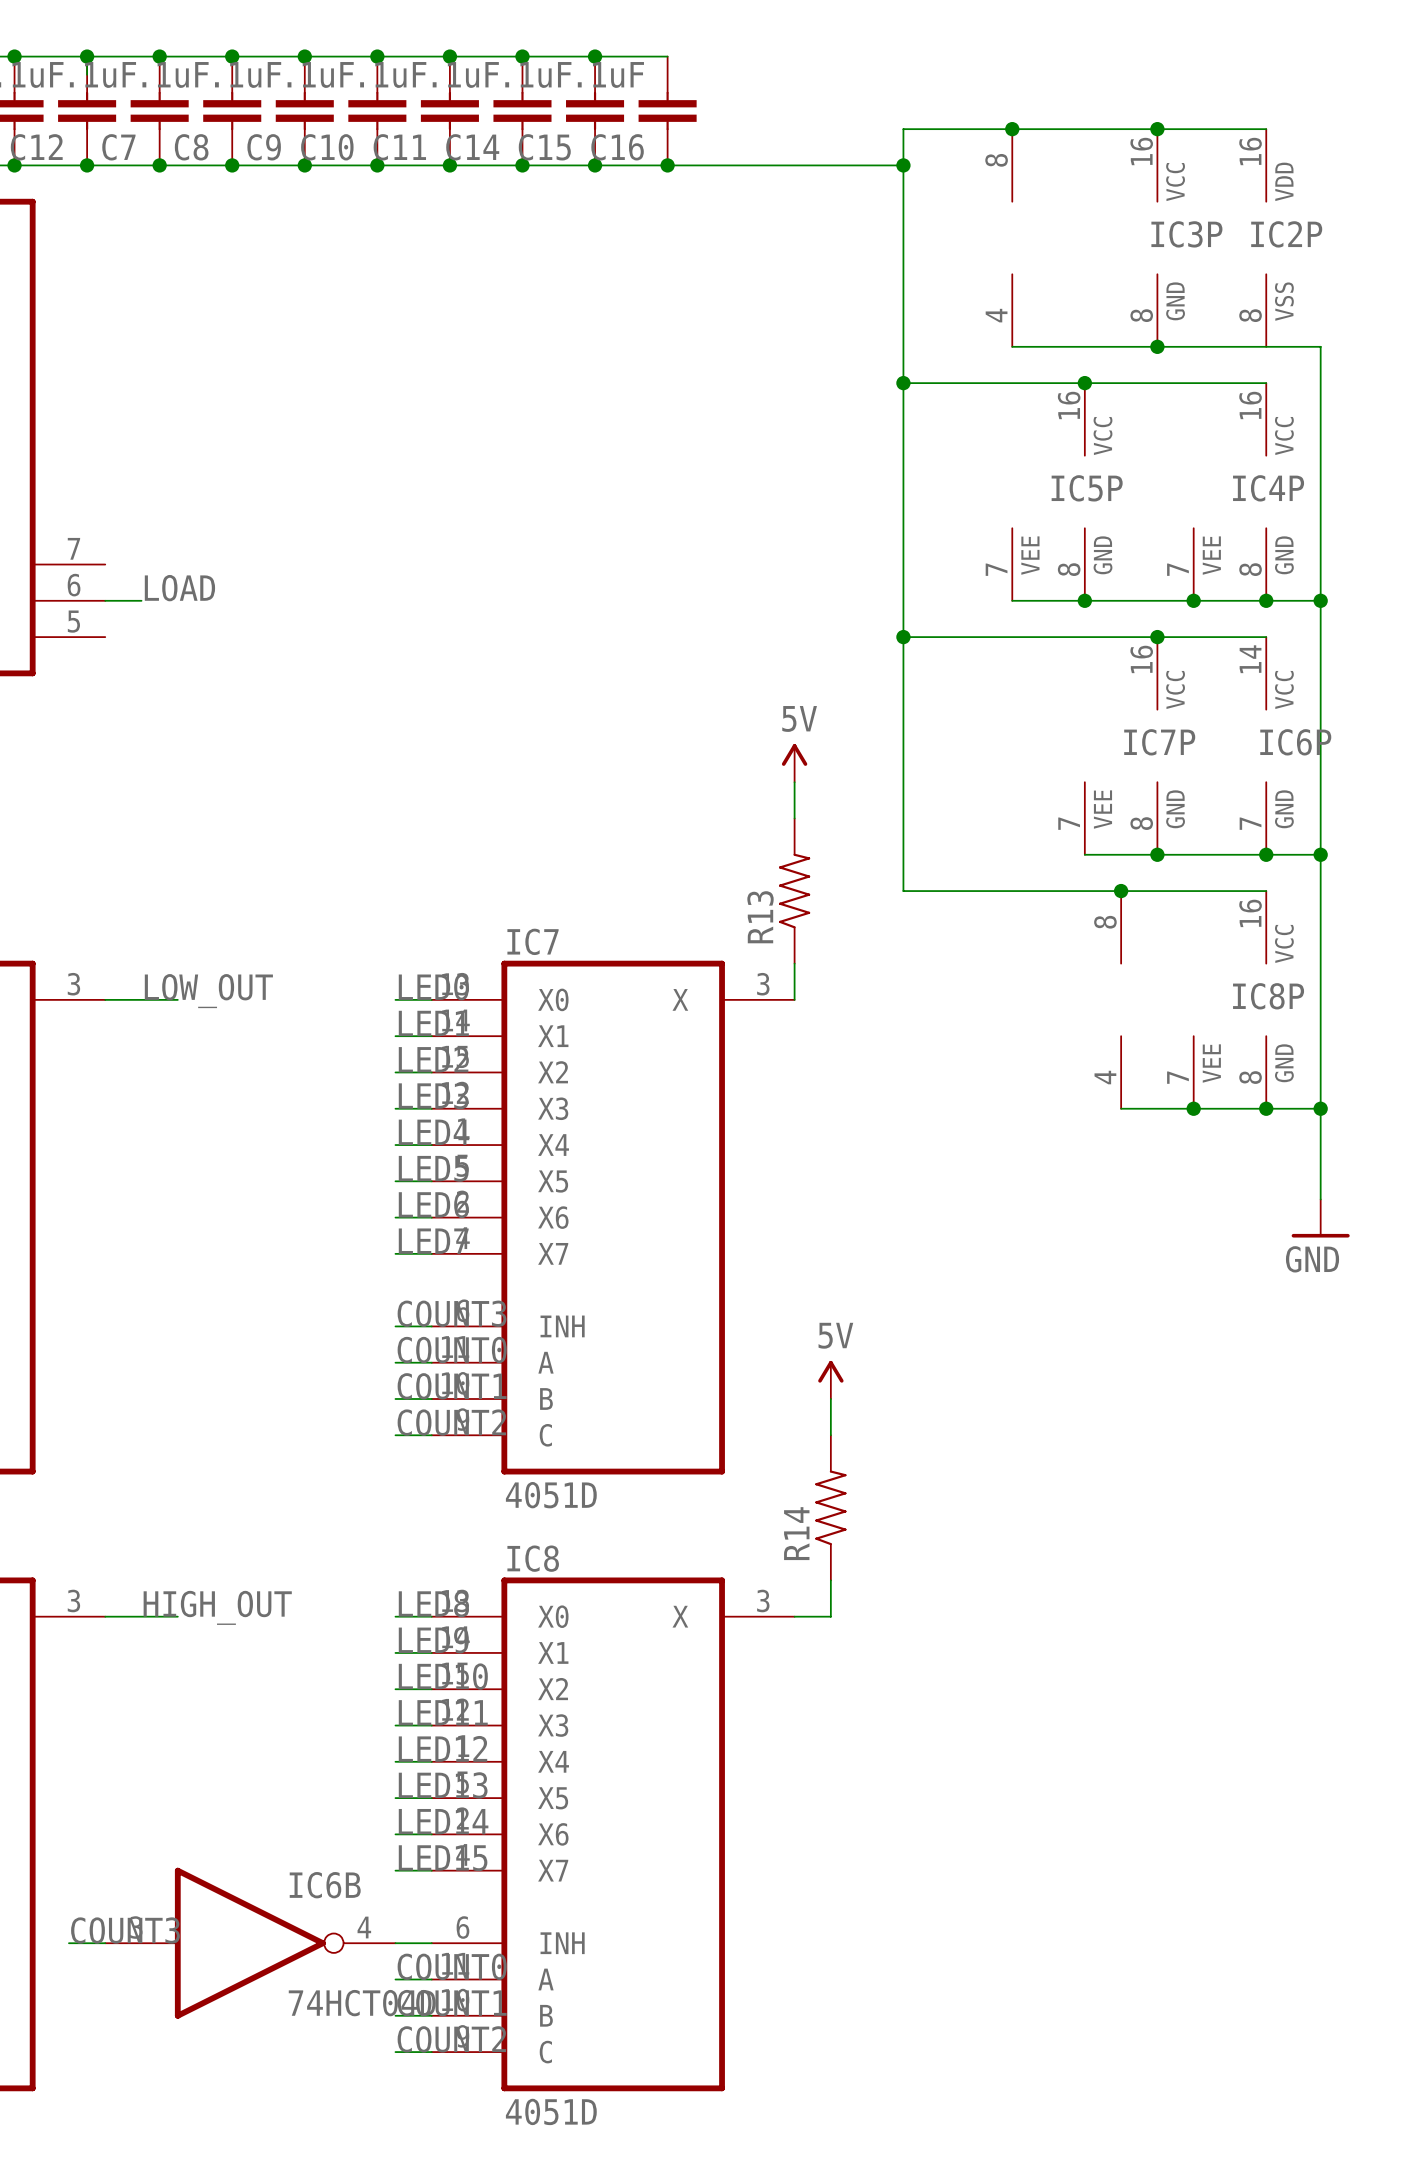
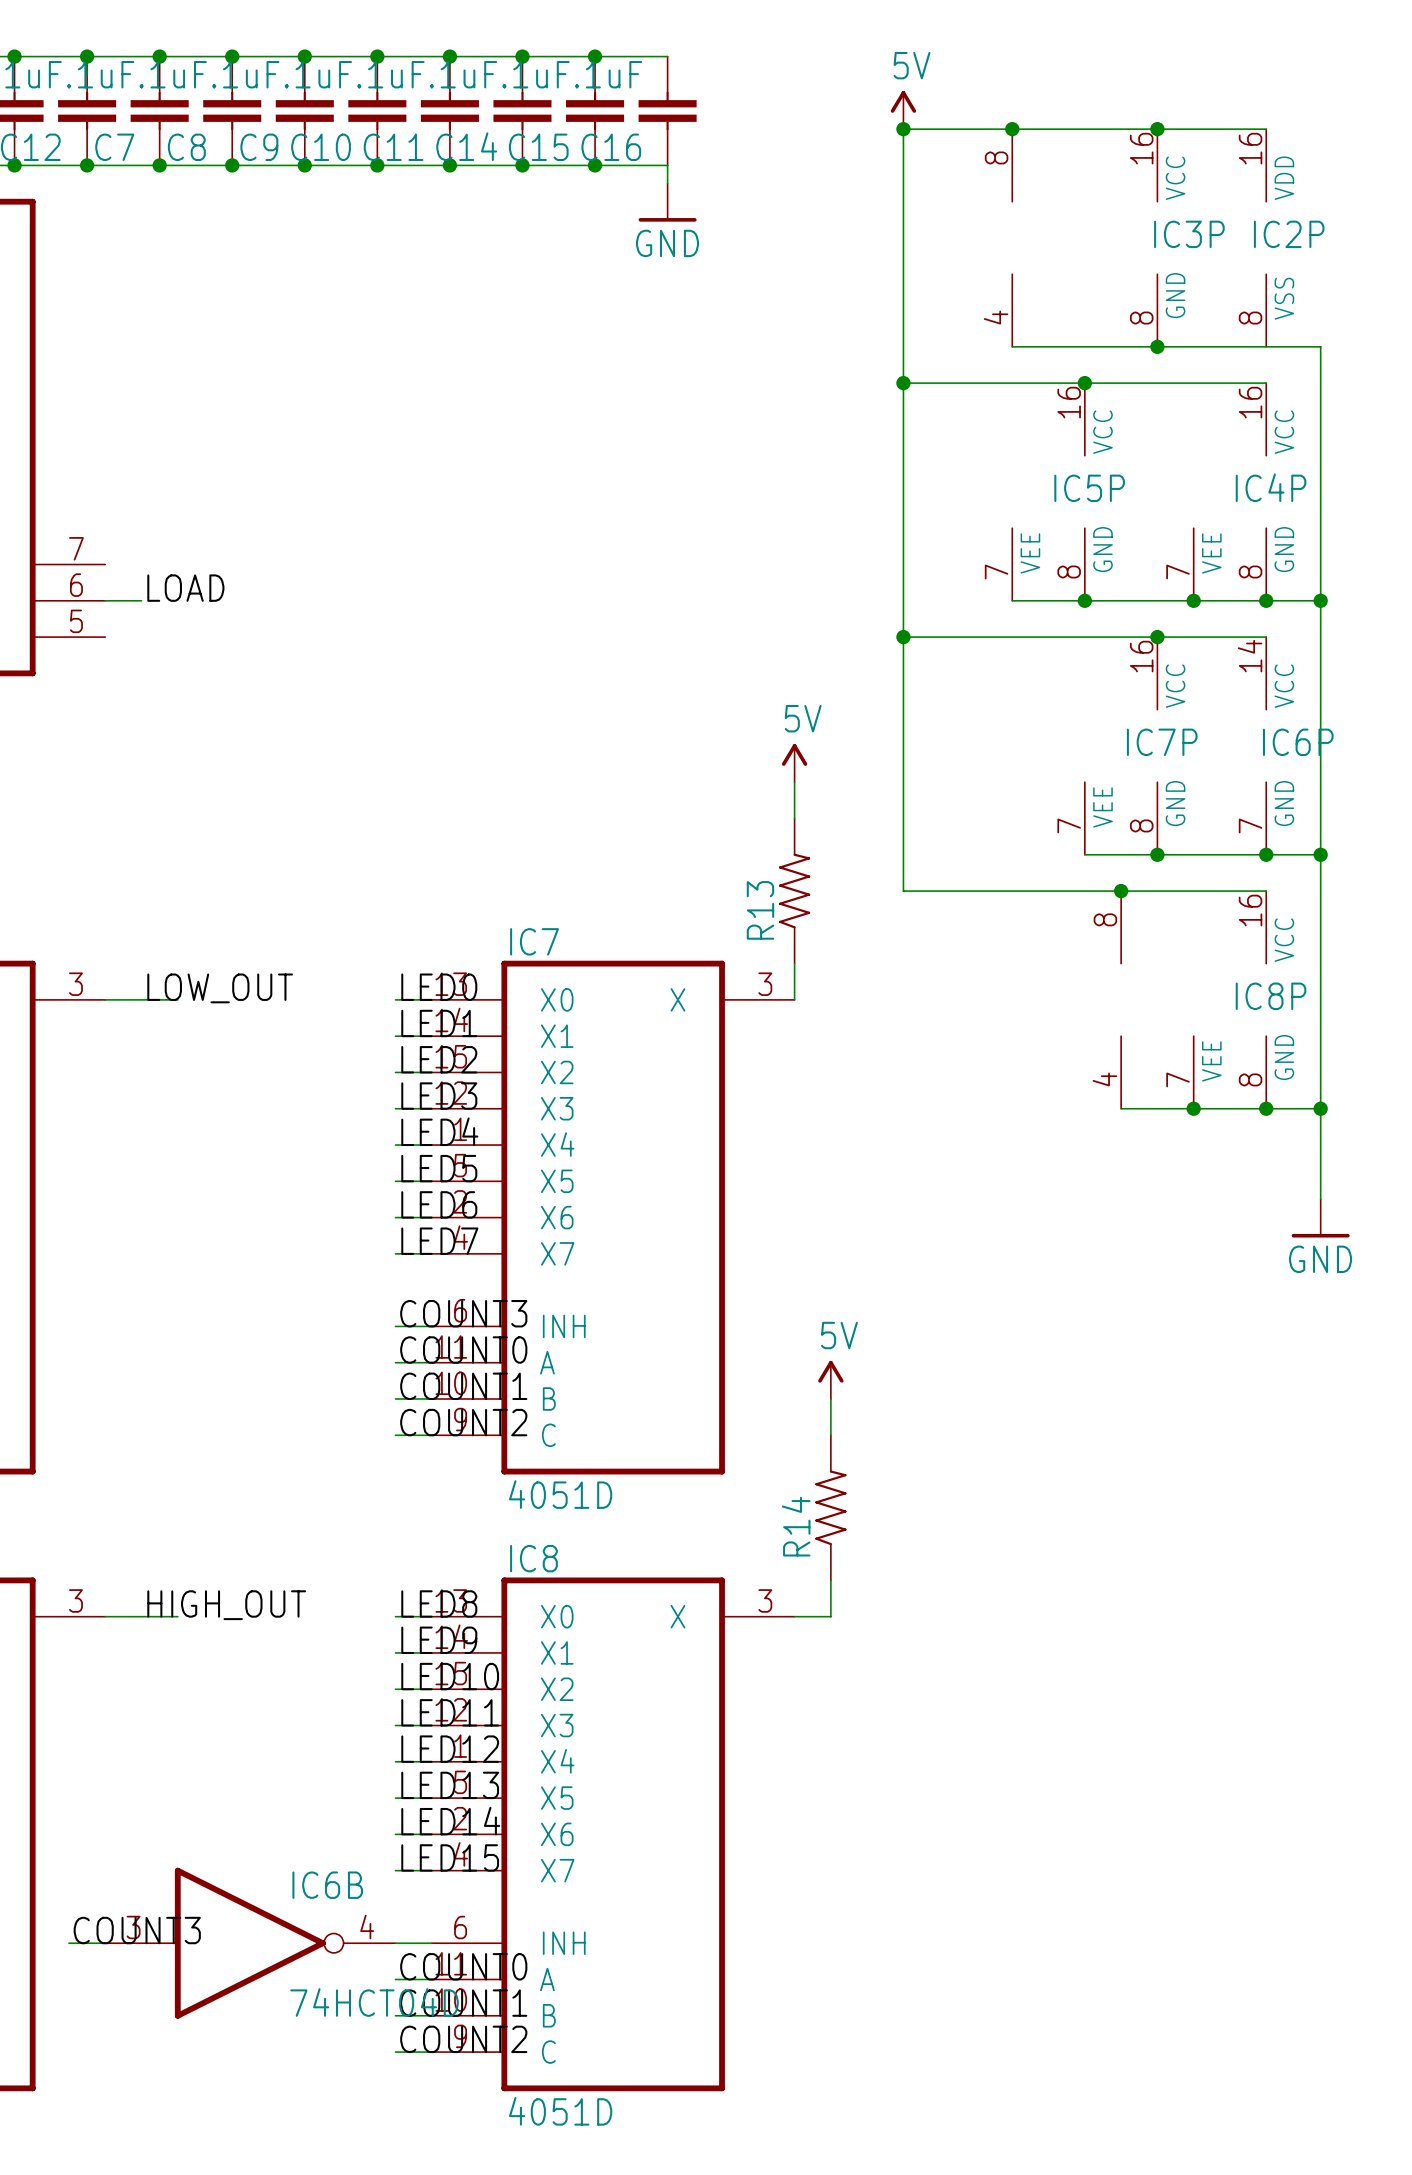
power symbol: none -> 5V (903, 110)
wire: (667, 165) (903, 165) -> (667, 165) (667, 183)
junction: (667, 165) -> none
junction position: (903, 165) -> (903, 129)
power symbol: none -> GND (667, 202)

